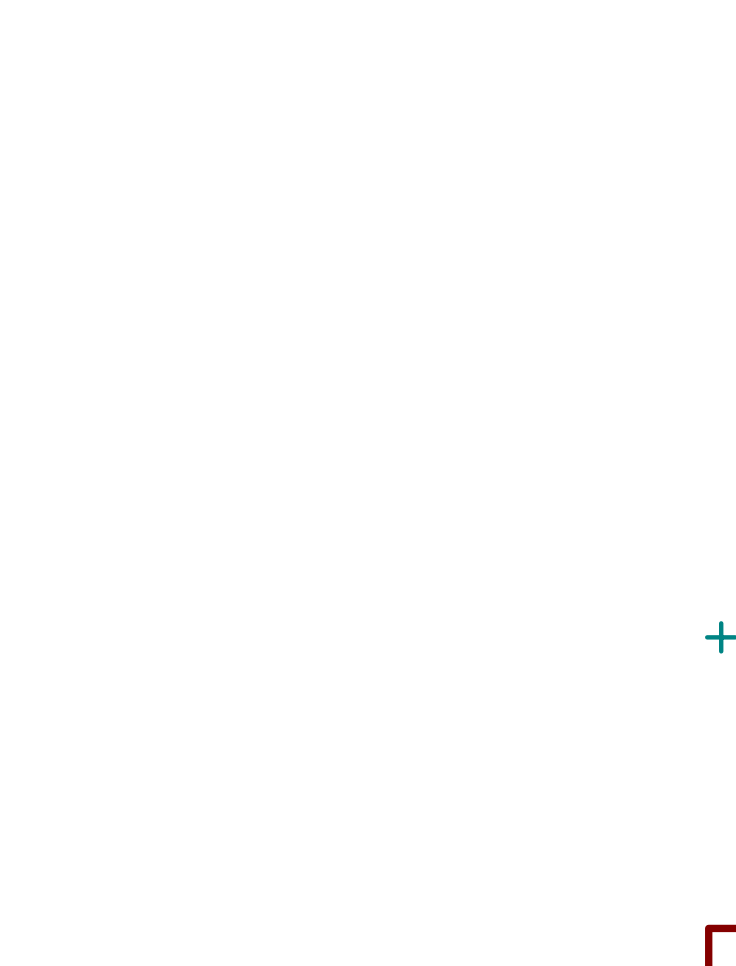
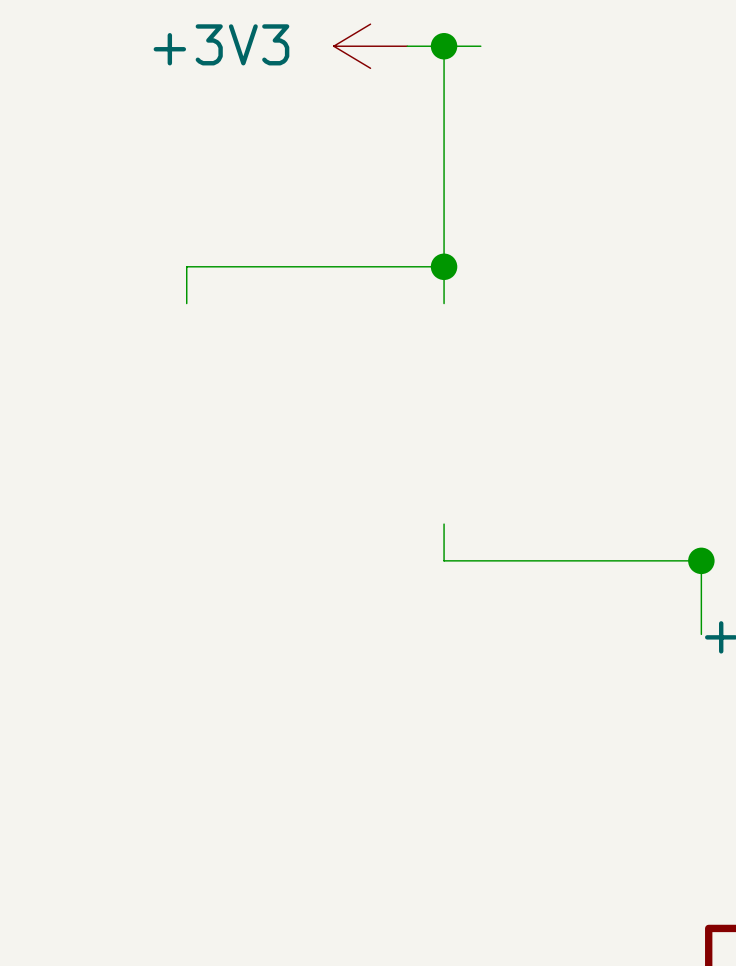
power symbol: none -> +3V3 (370, 46)
wire: none -> (407, 46) (480, 46)
wire: none -> (444, 46) (444, 303)
junction: none -> (444, 46)
wire: none -> (444, 266) (186, 266) (186, 303)
junction: none -> (444, 266)
wire: none -> (444, 524) (444, 560) (701, 560) (701, 634)
junction: none -> (701, 560)

